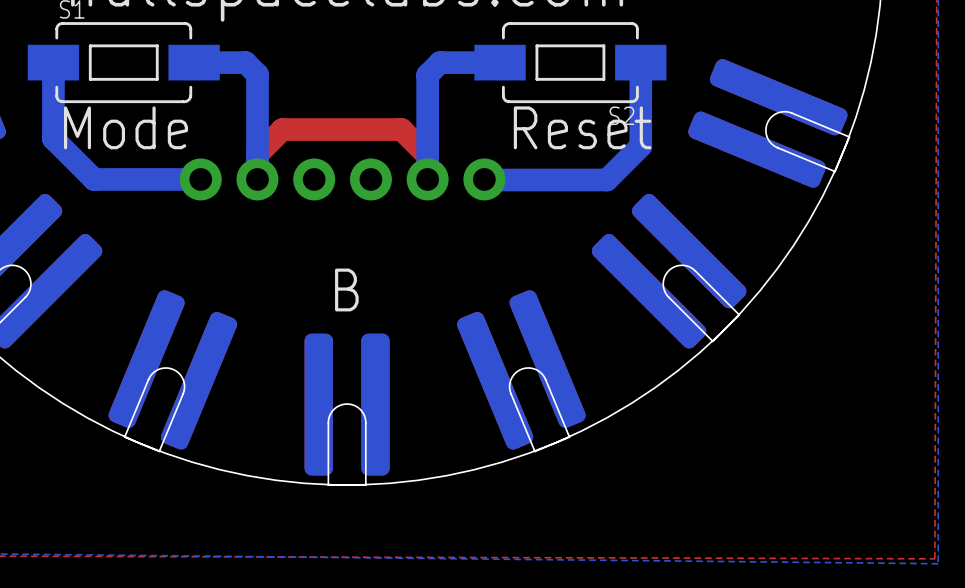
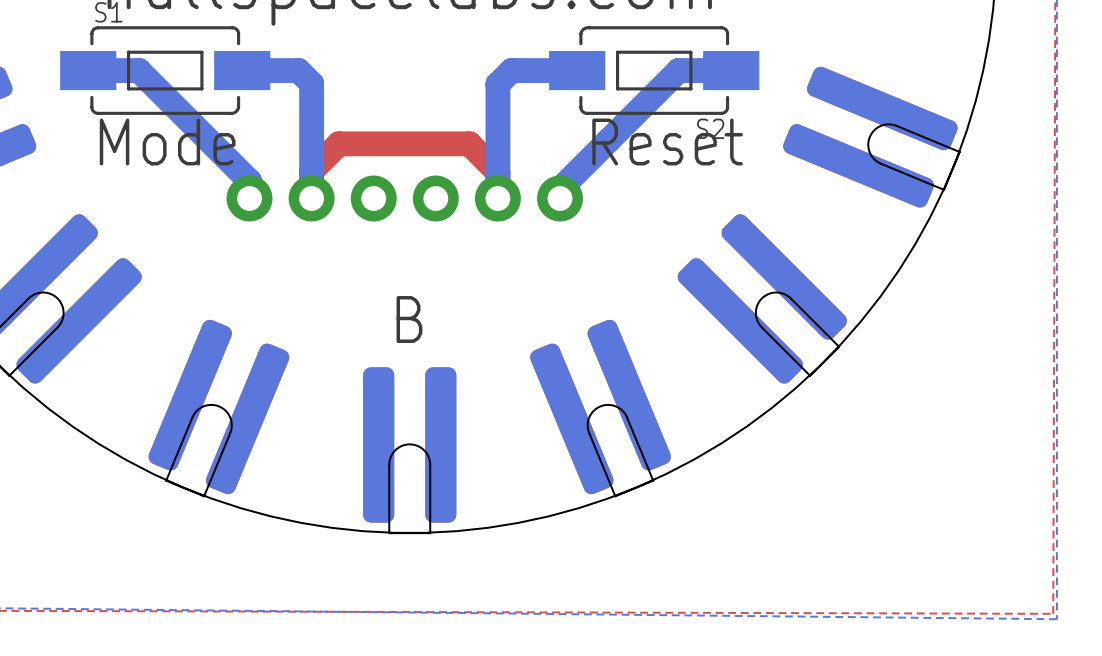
bottom track: (53, 62) (53, 138) (94, 179) (200, 179) -> (88, 70) (138, 70) (249, 181) (249, 198)
bottom track: (640, 62) (640, 146) (606, 180) (484, 180) -> (731, 70) (678, 70) (560, 189) (560, 198)

